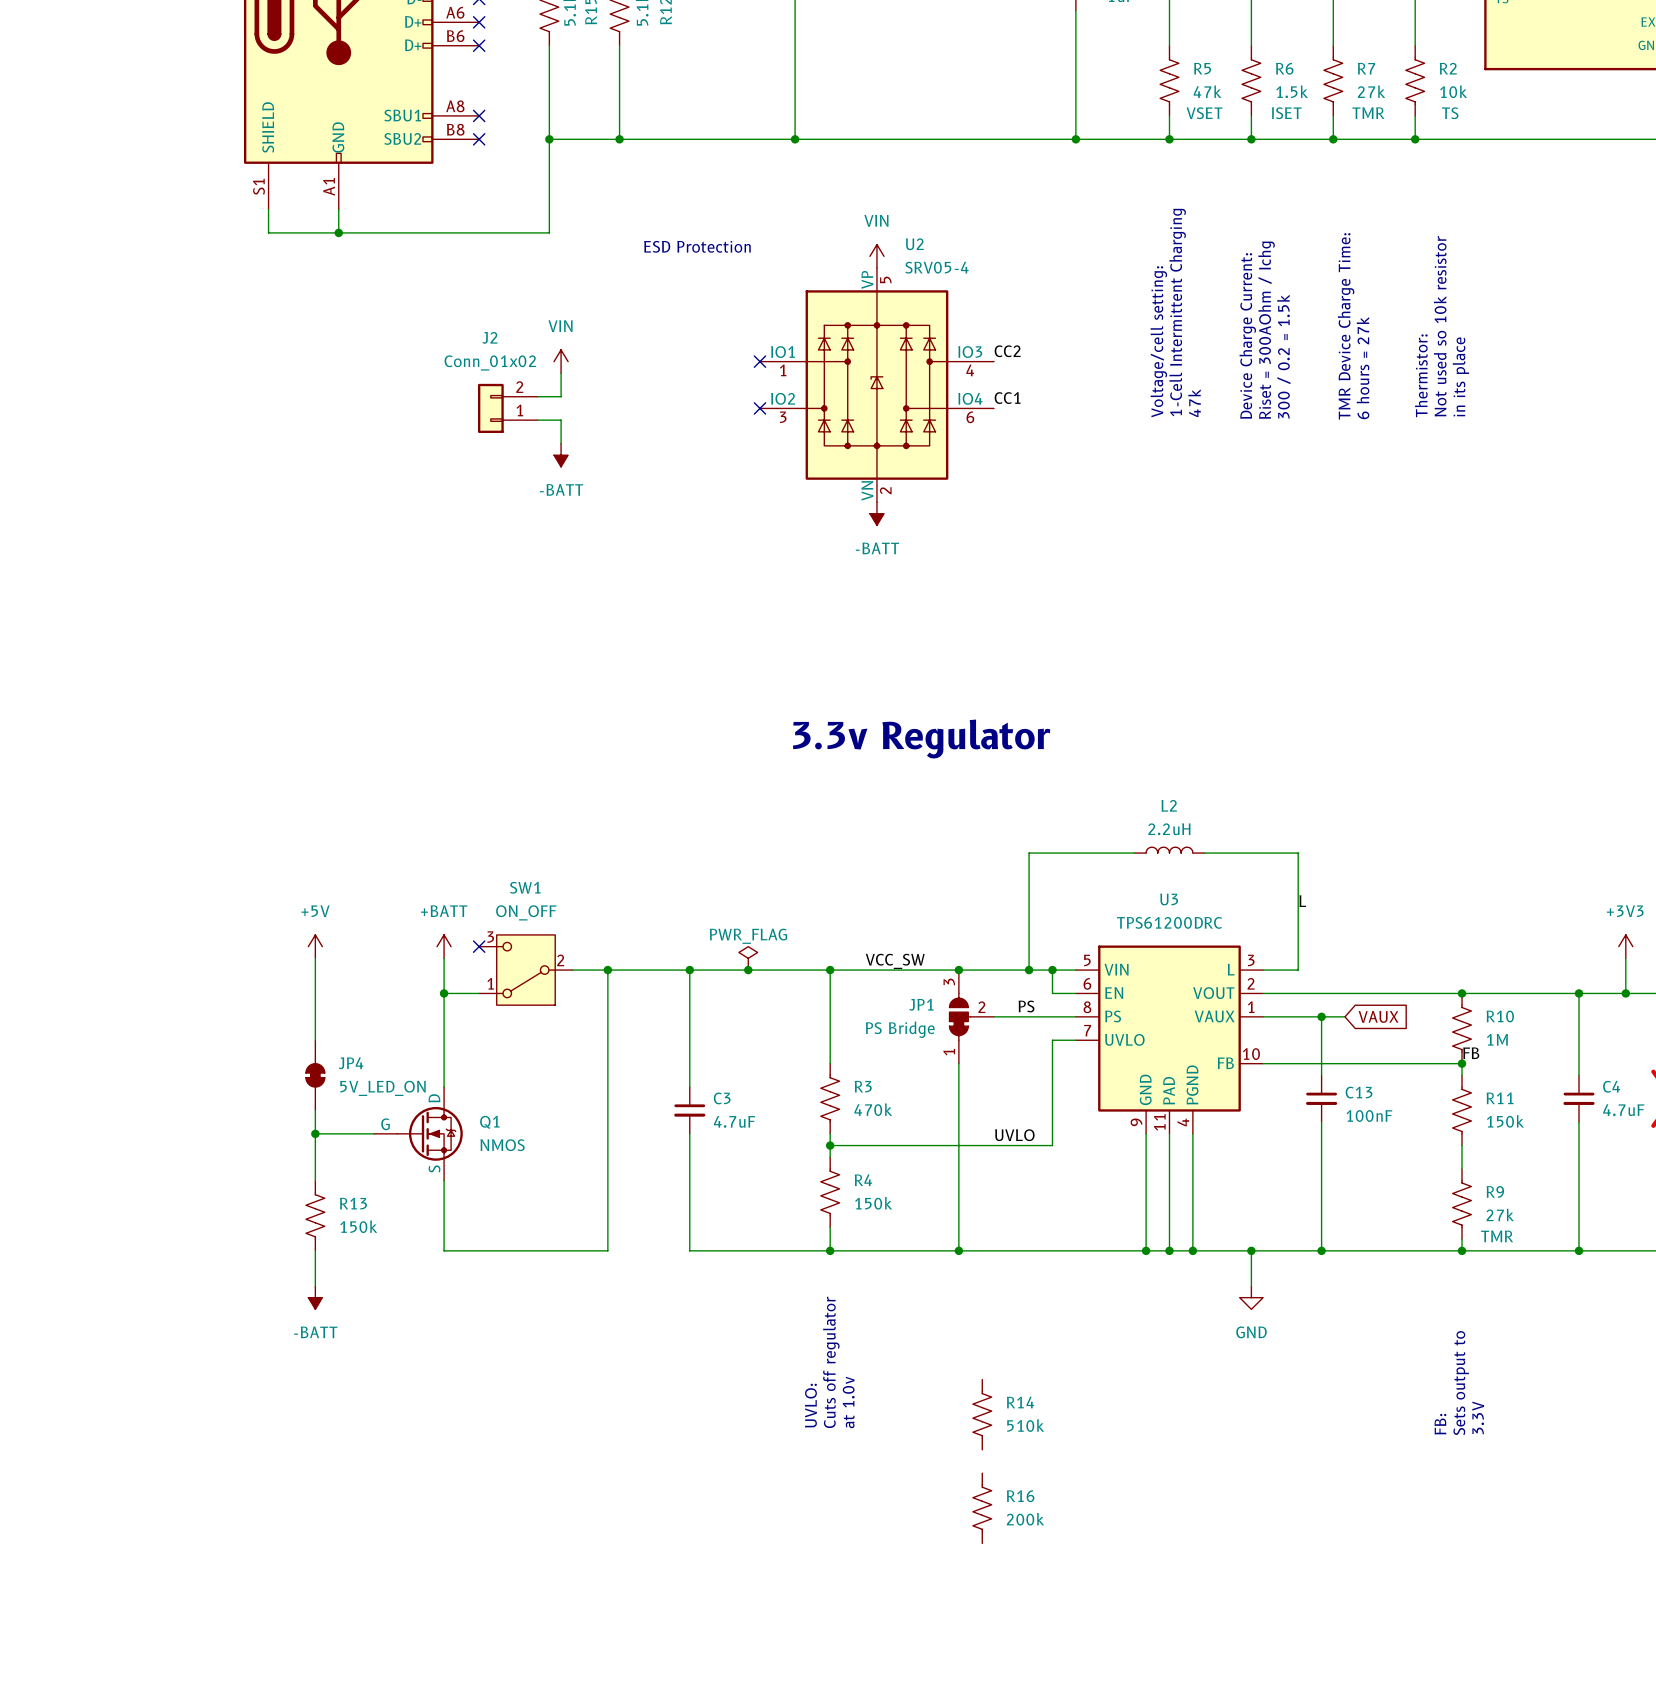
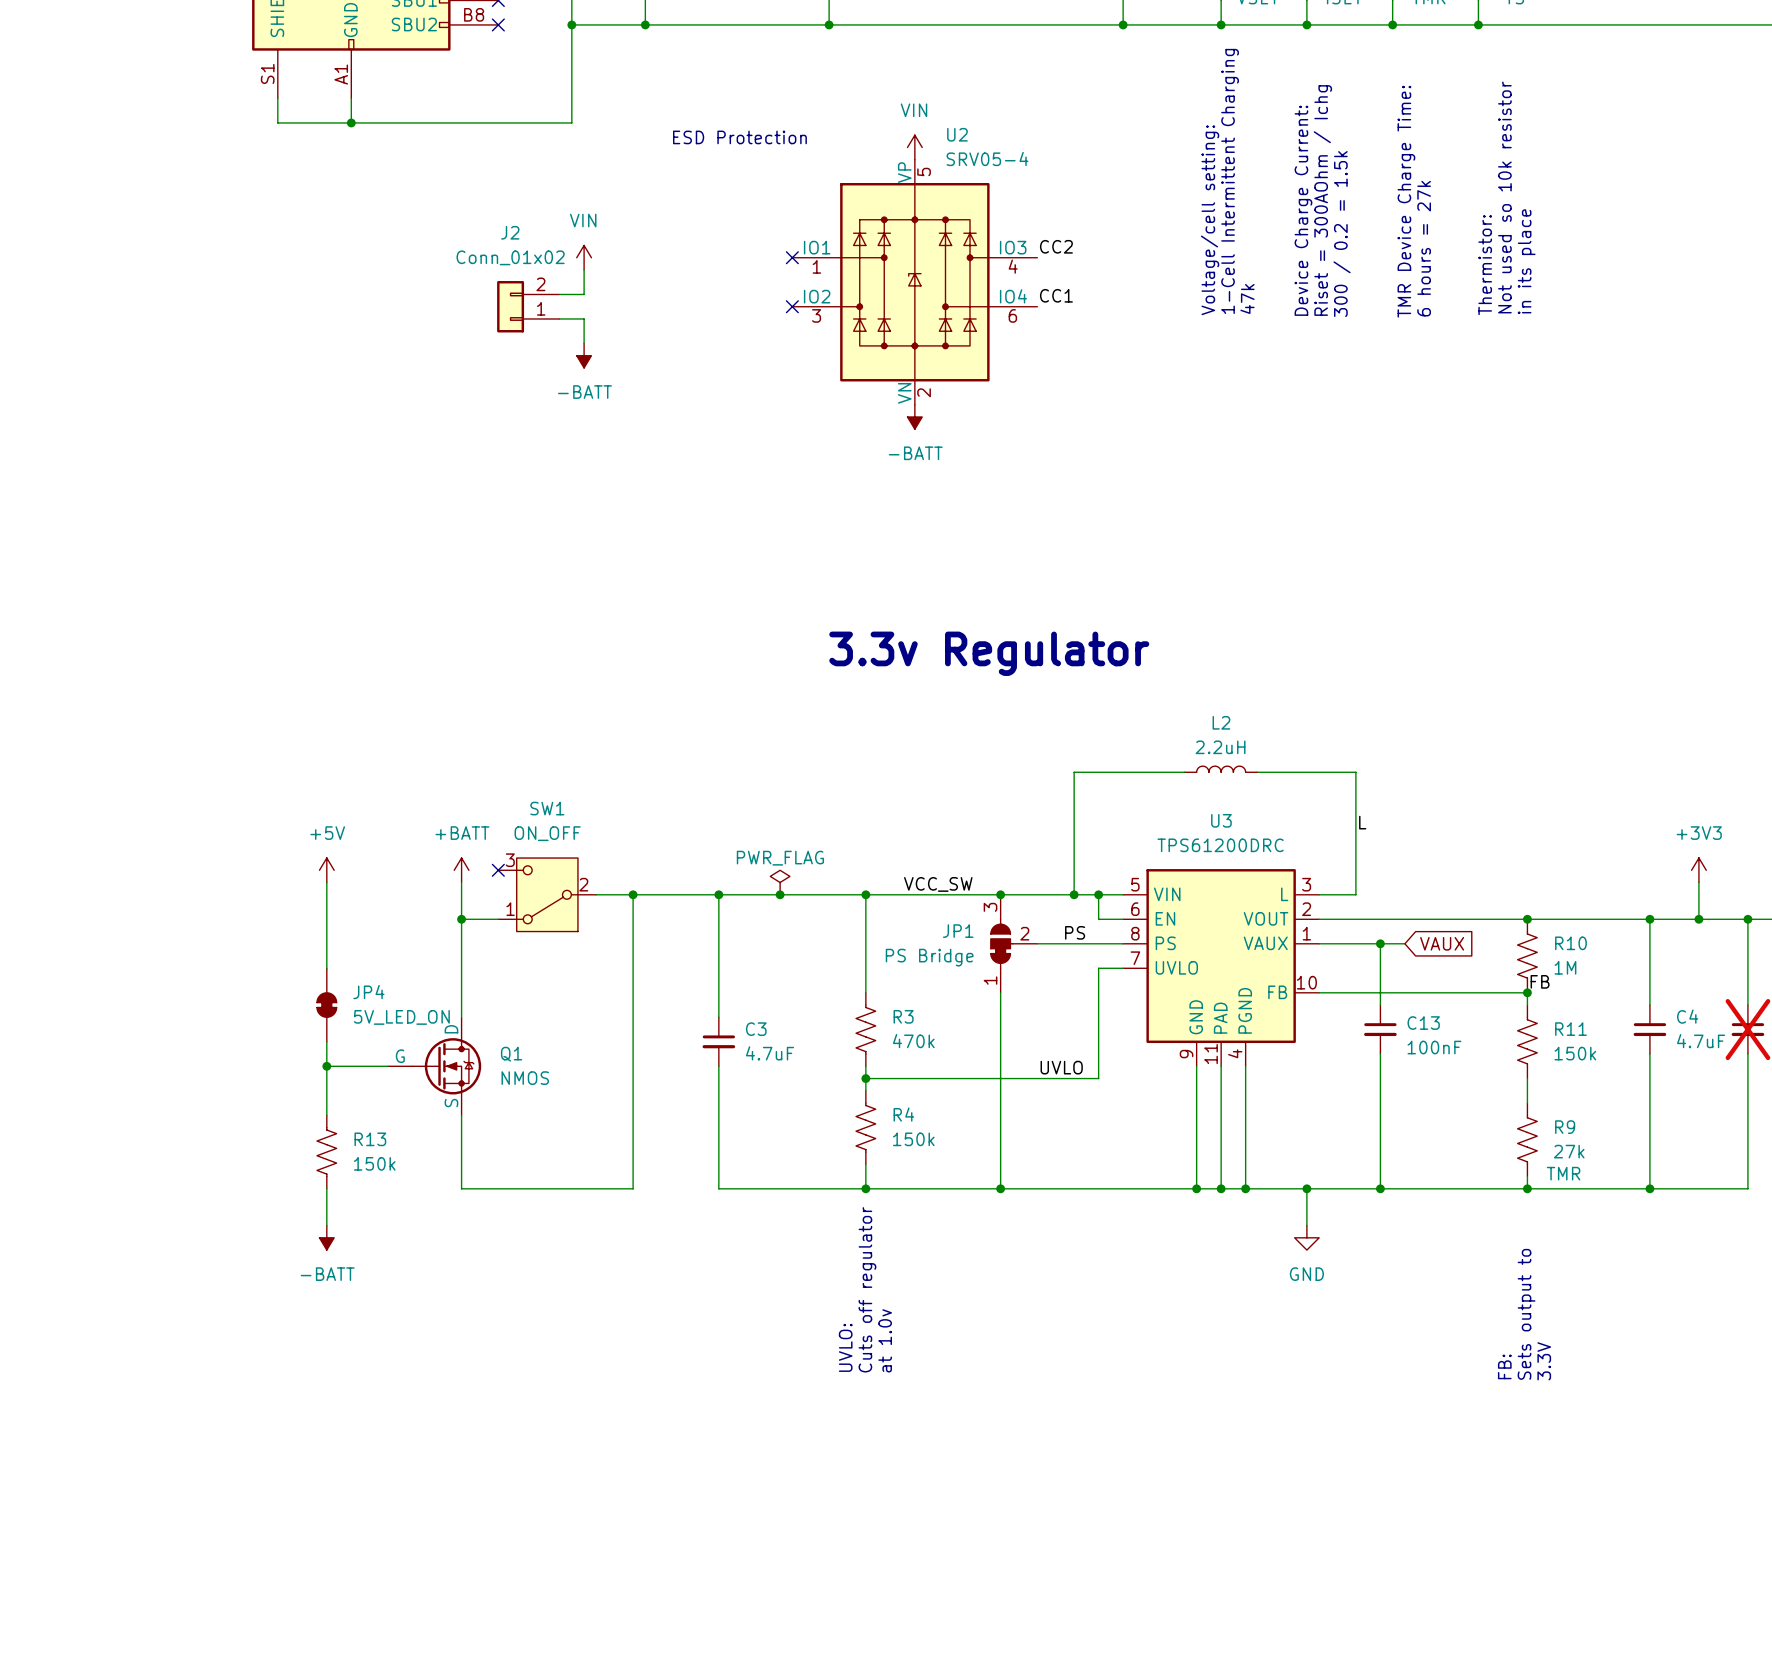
R14: 510k (982, 1414) -> none
R16: 200k (982, 1508) -> none

